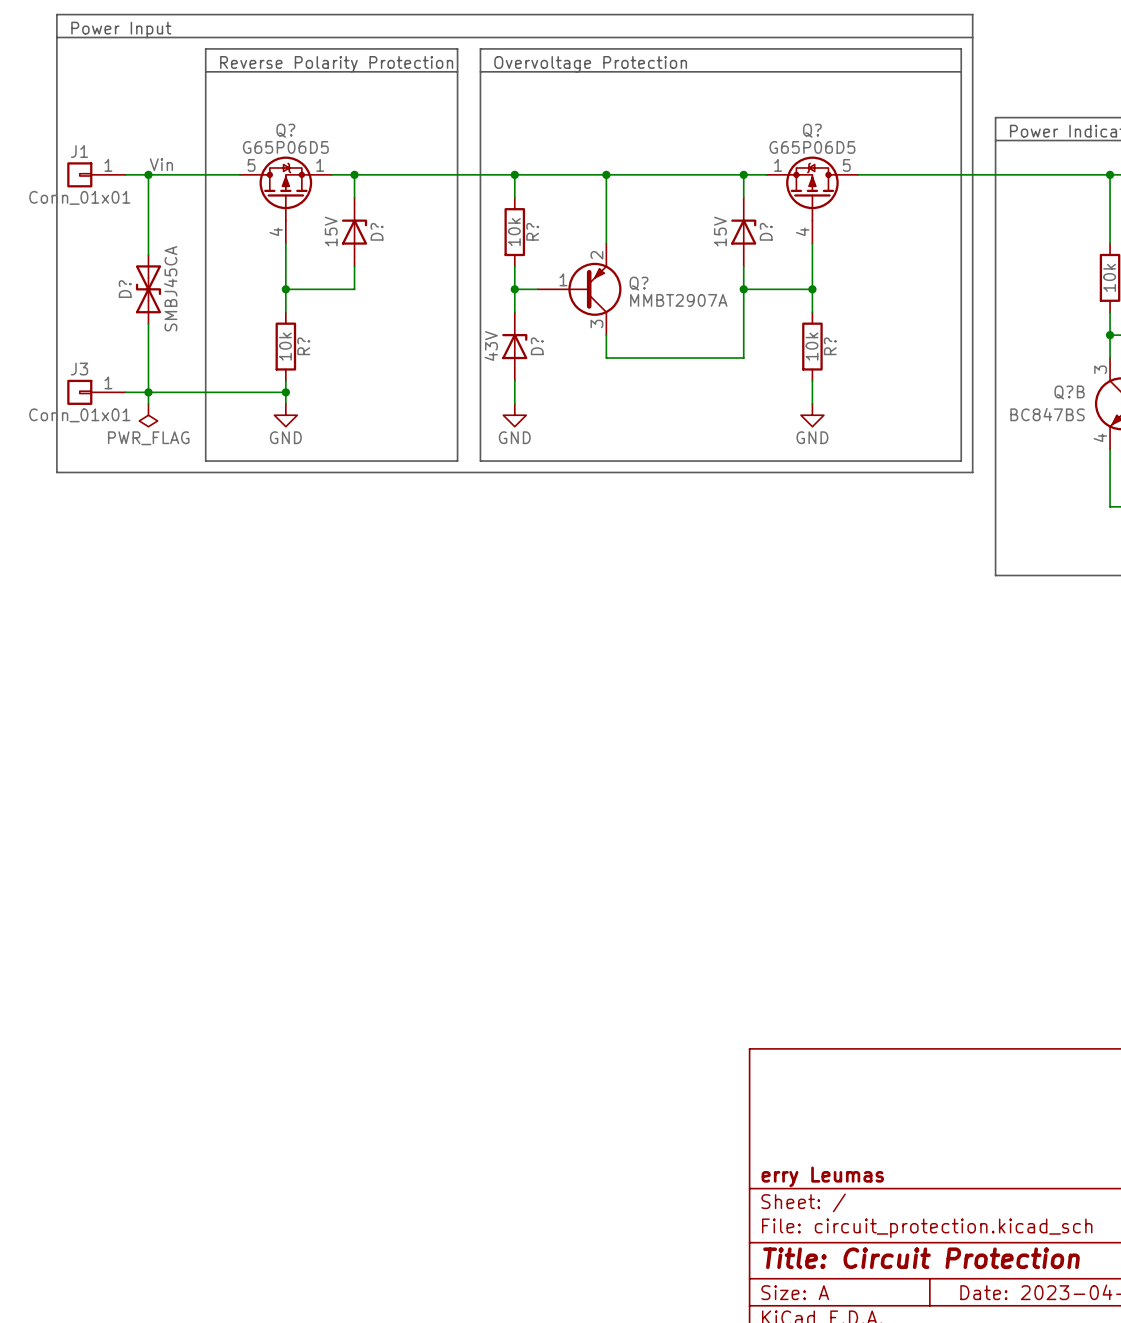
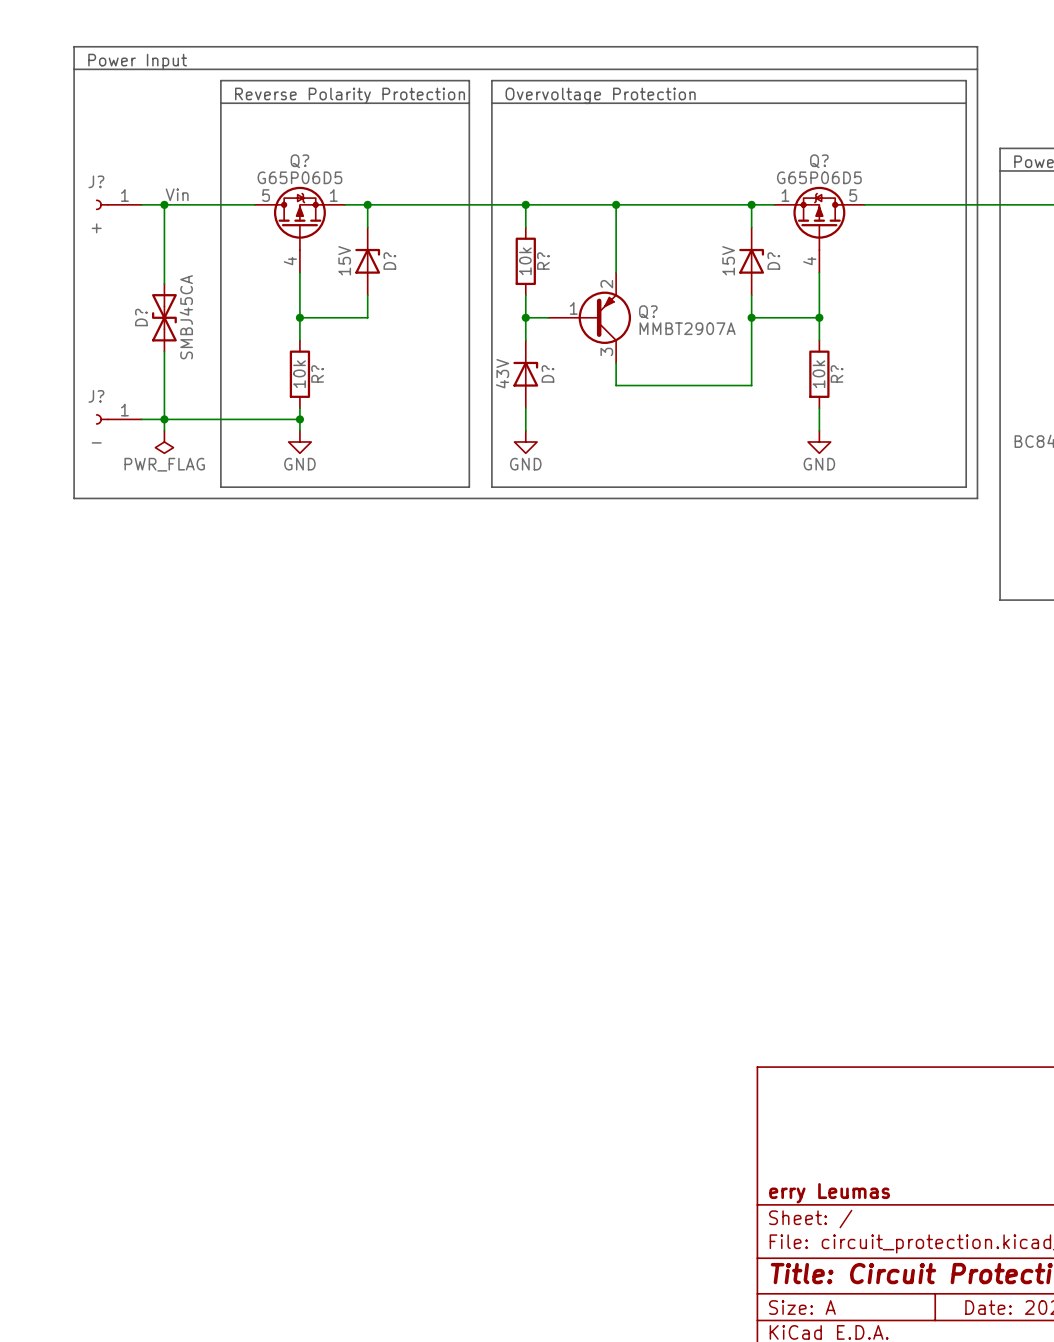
J1: Conn_01x01 (96, 174) -> none
J?: none -> + (118, 204)
J3: Conn_01x01 (96, 392) -> none
J?: none -> - (118, 419)

